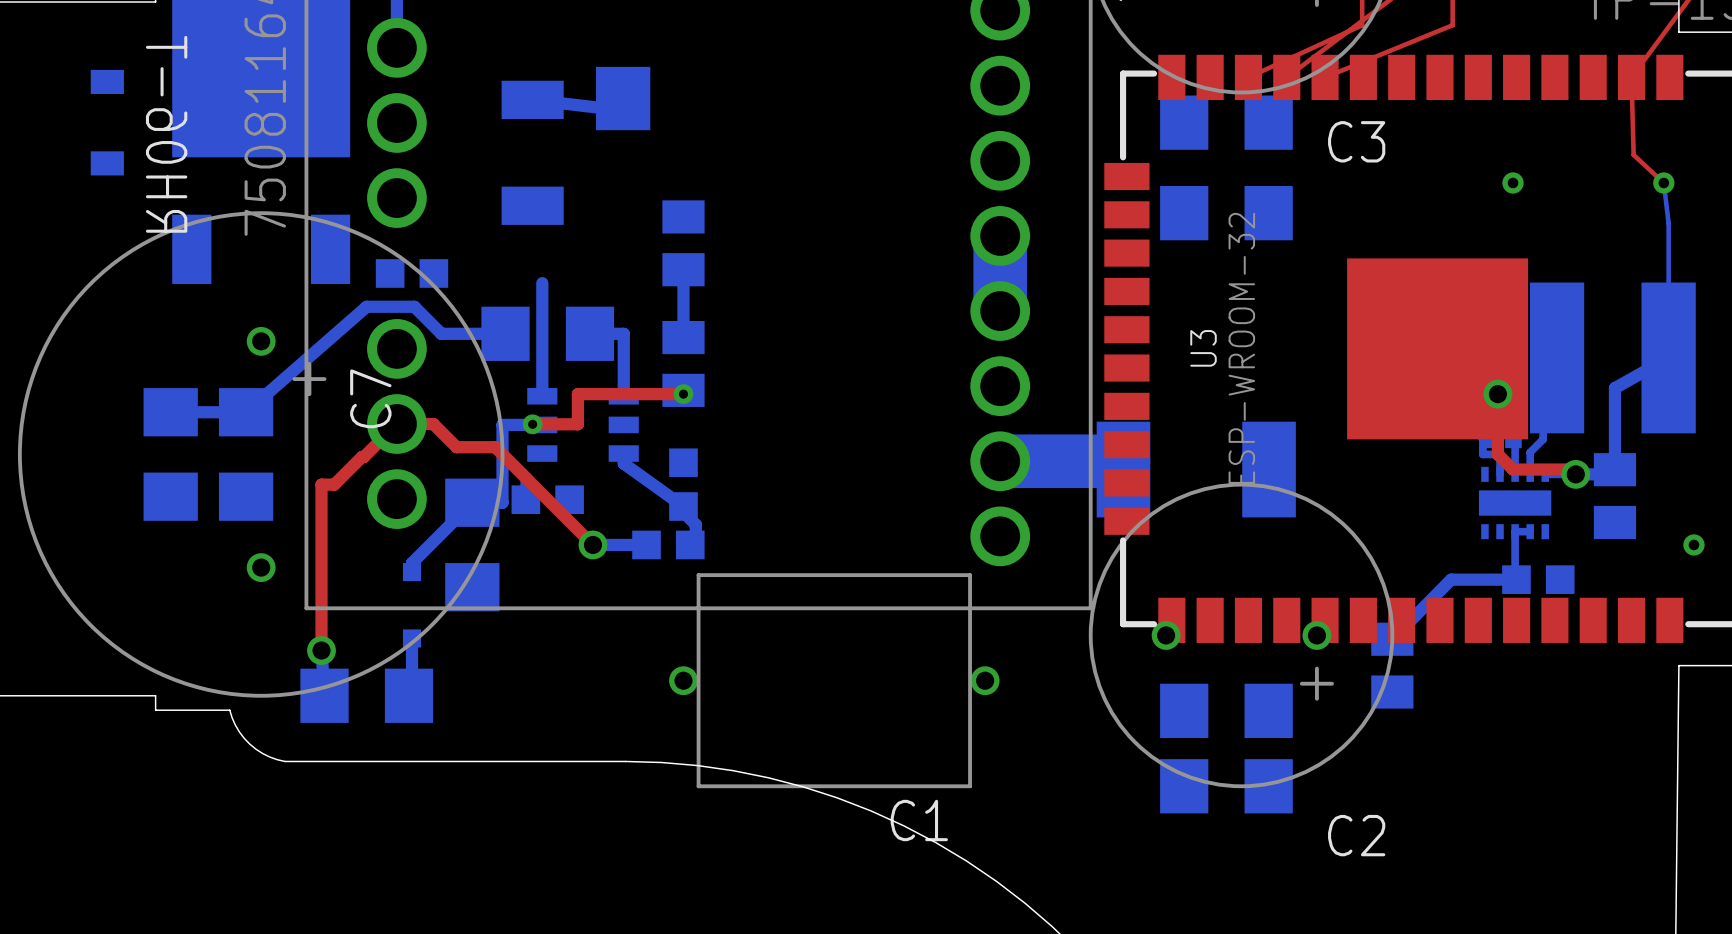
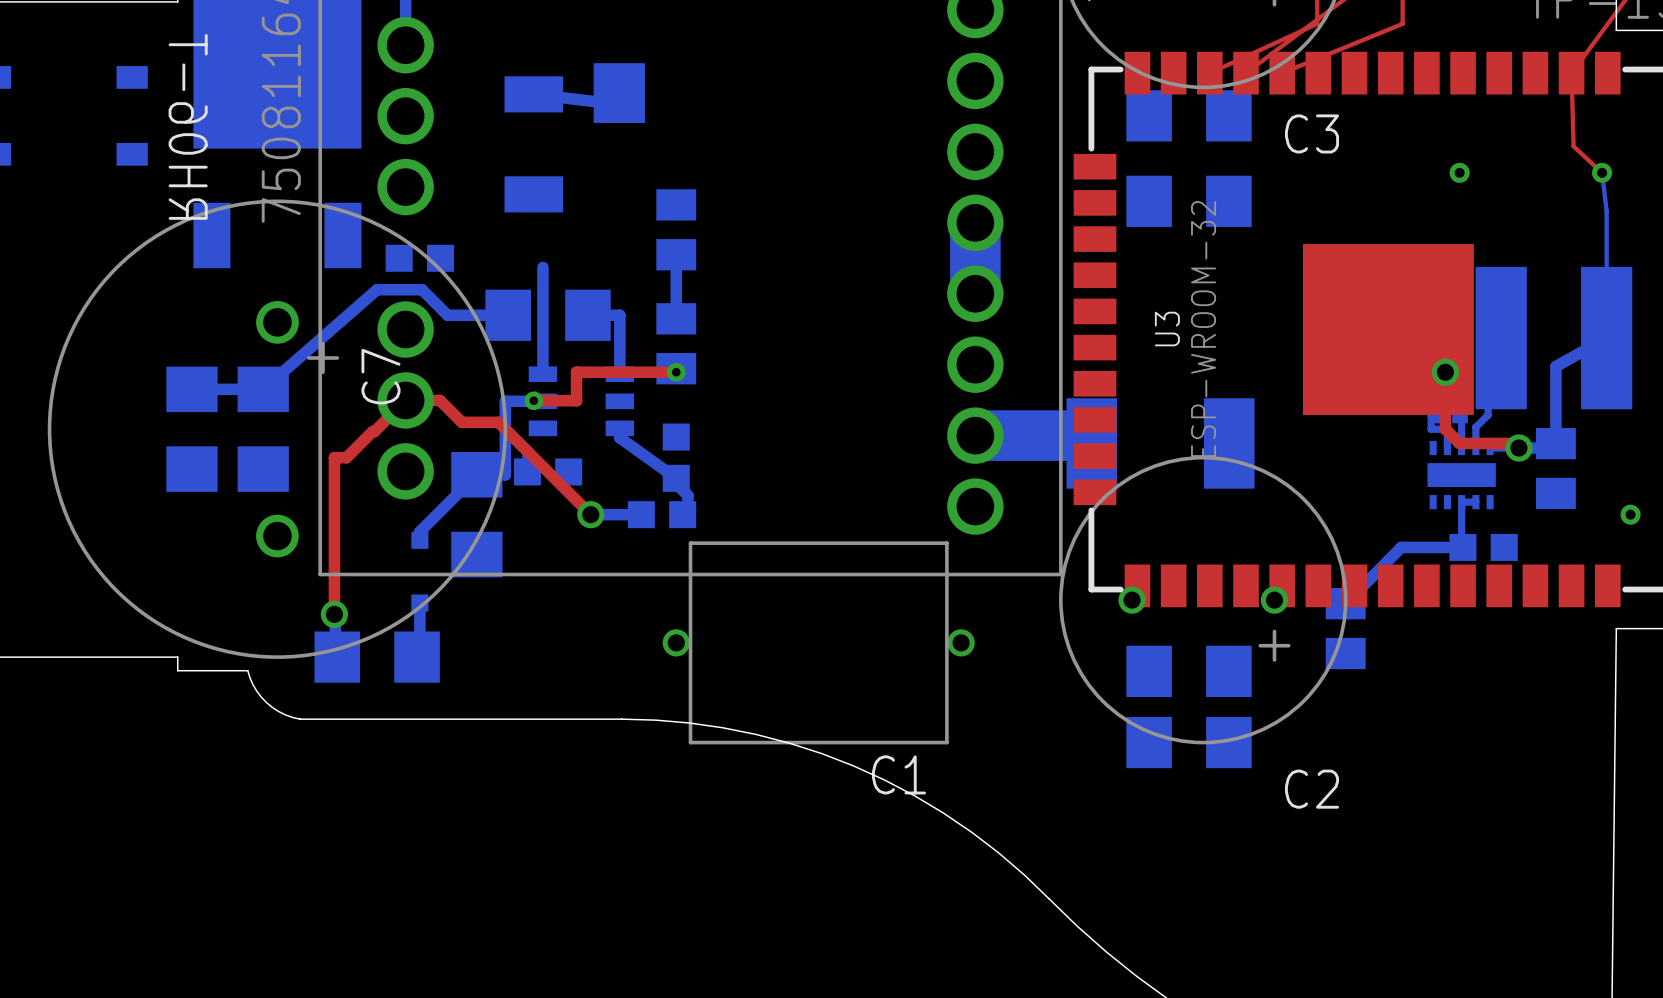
C7 footprint: [17, 211, 505, 698] -> [47, 199, 508, 659]

